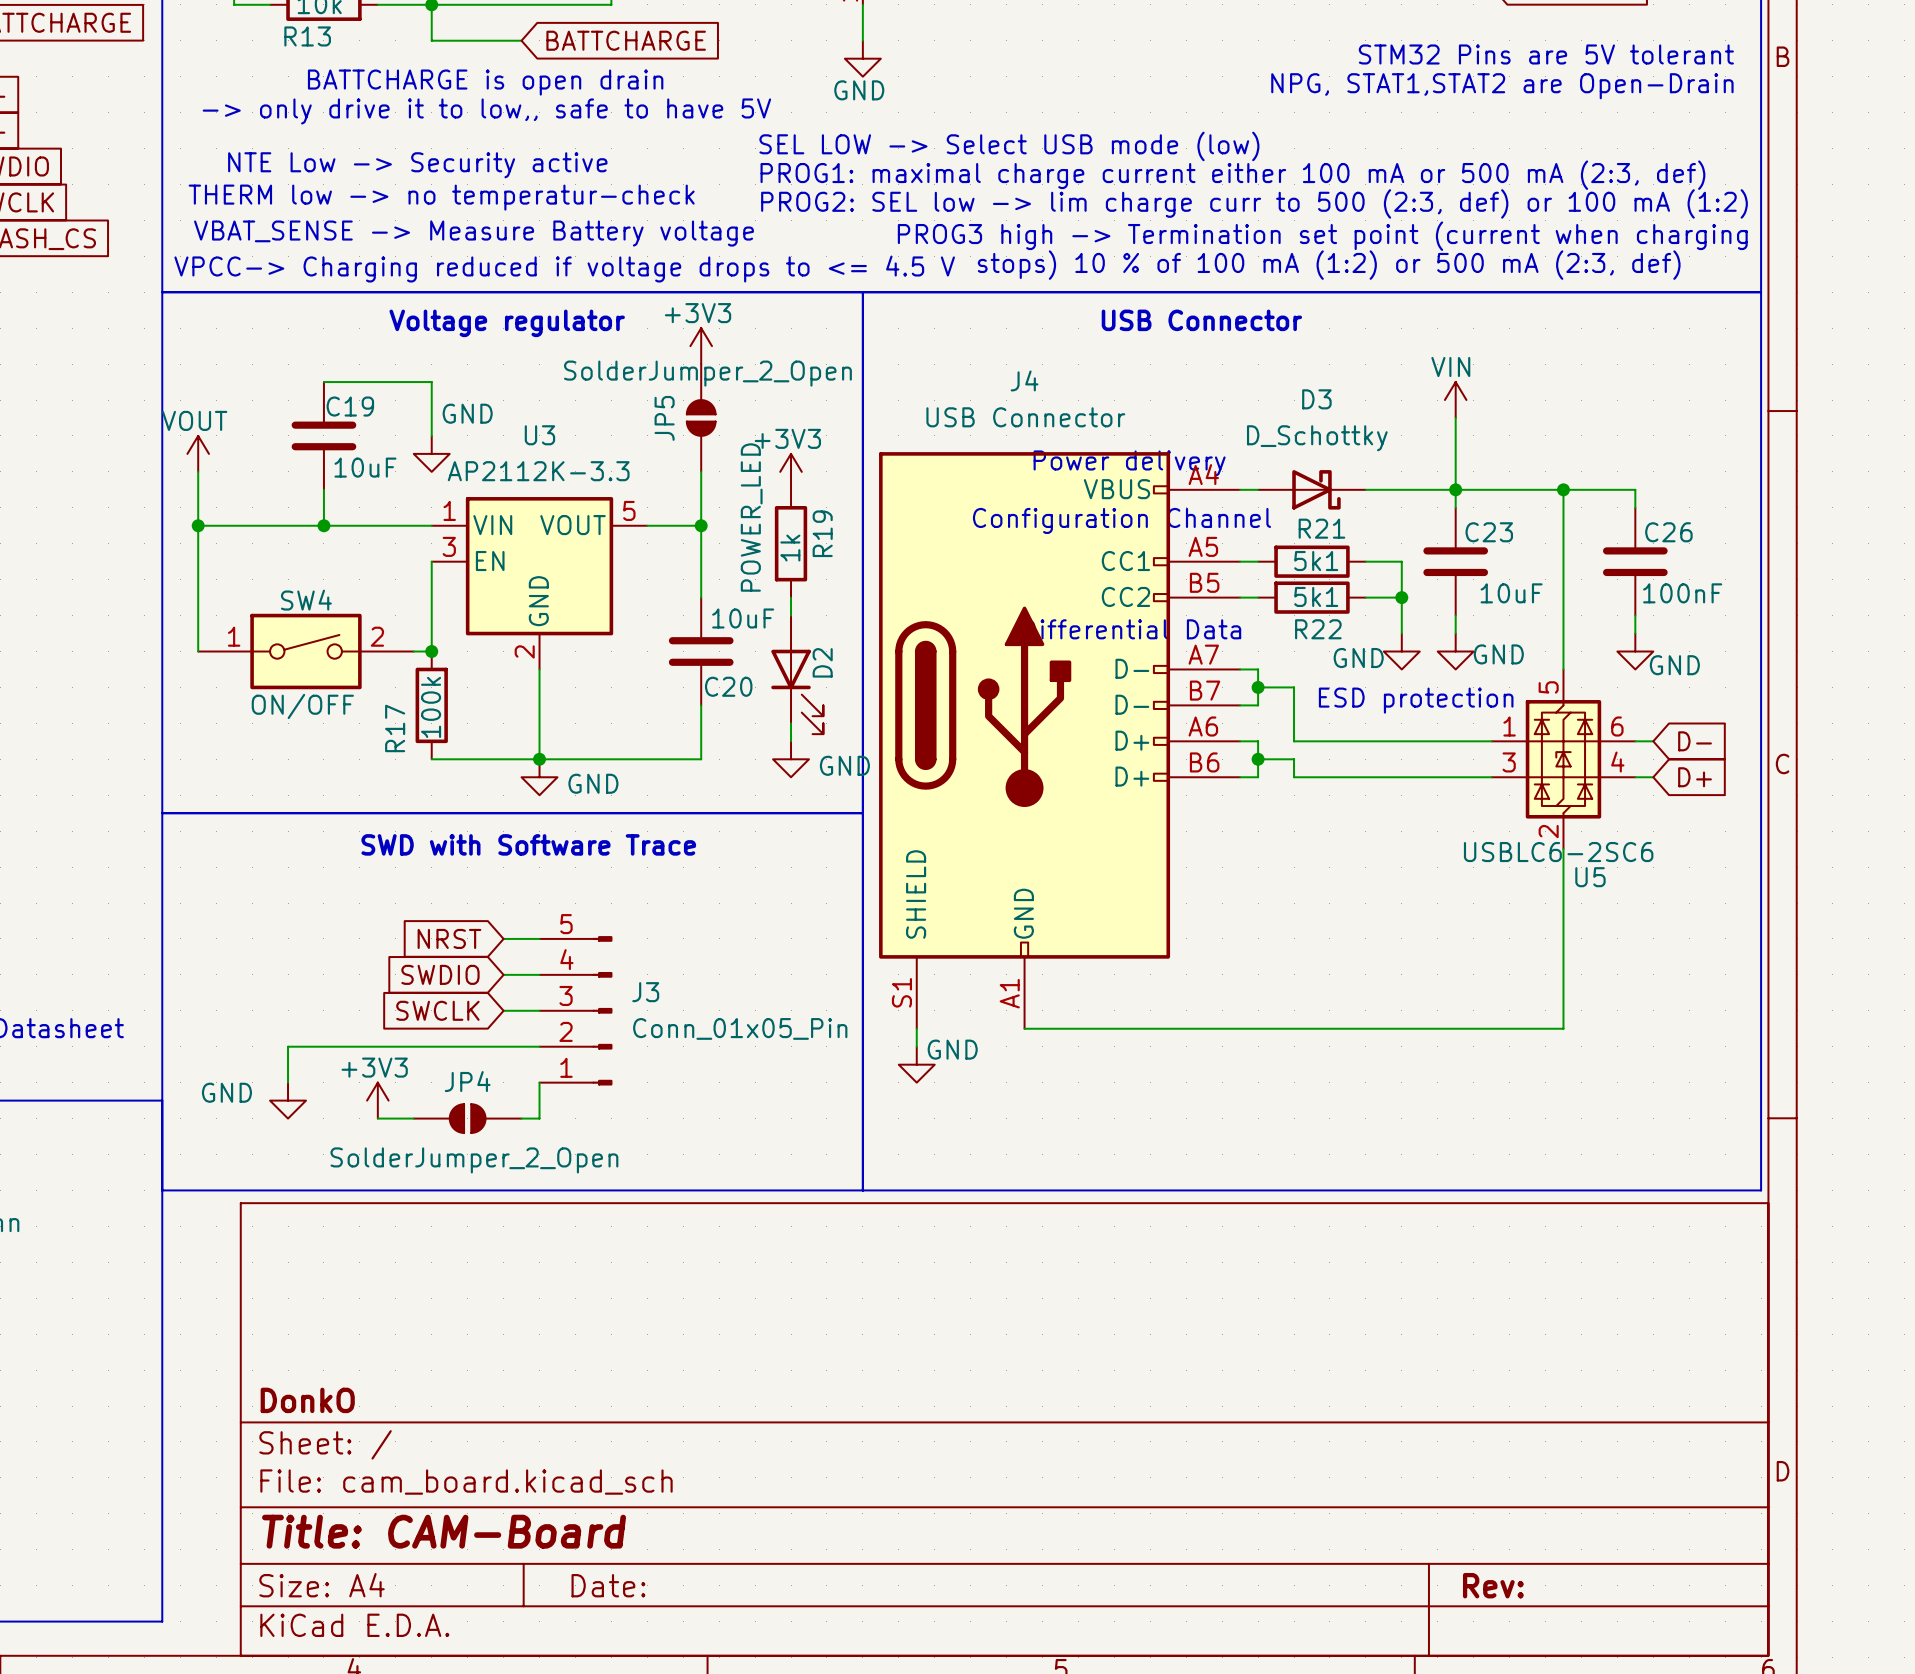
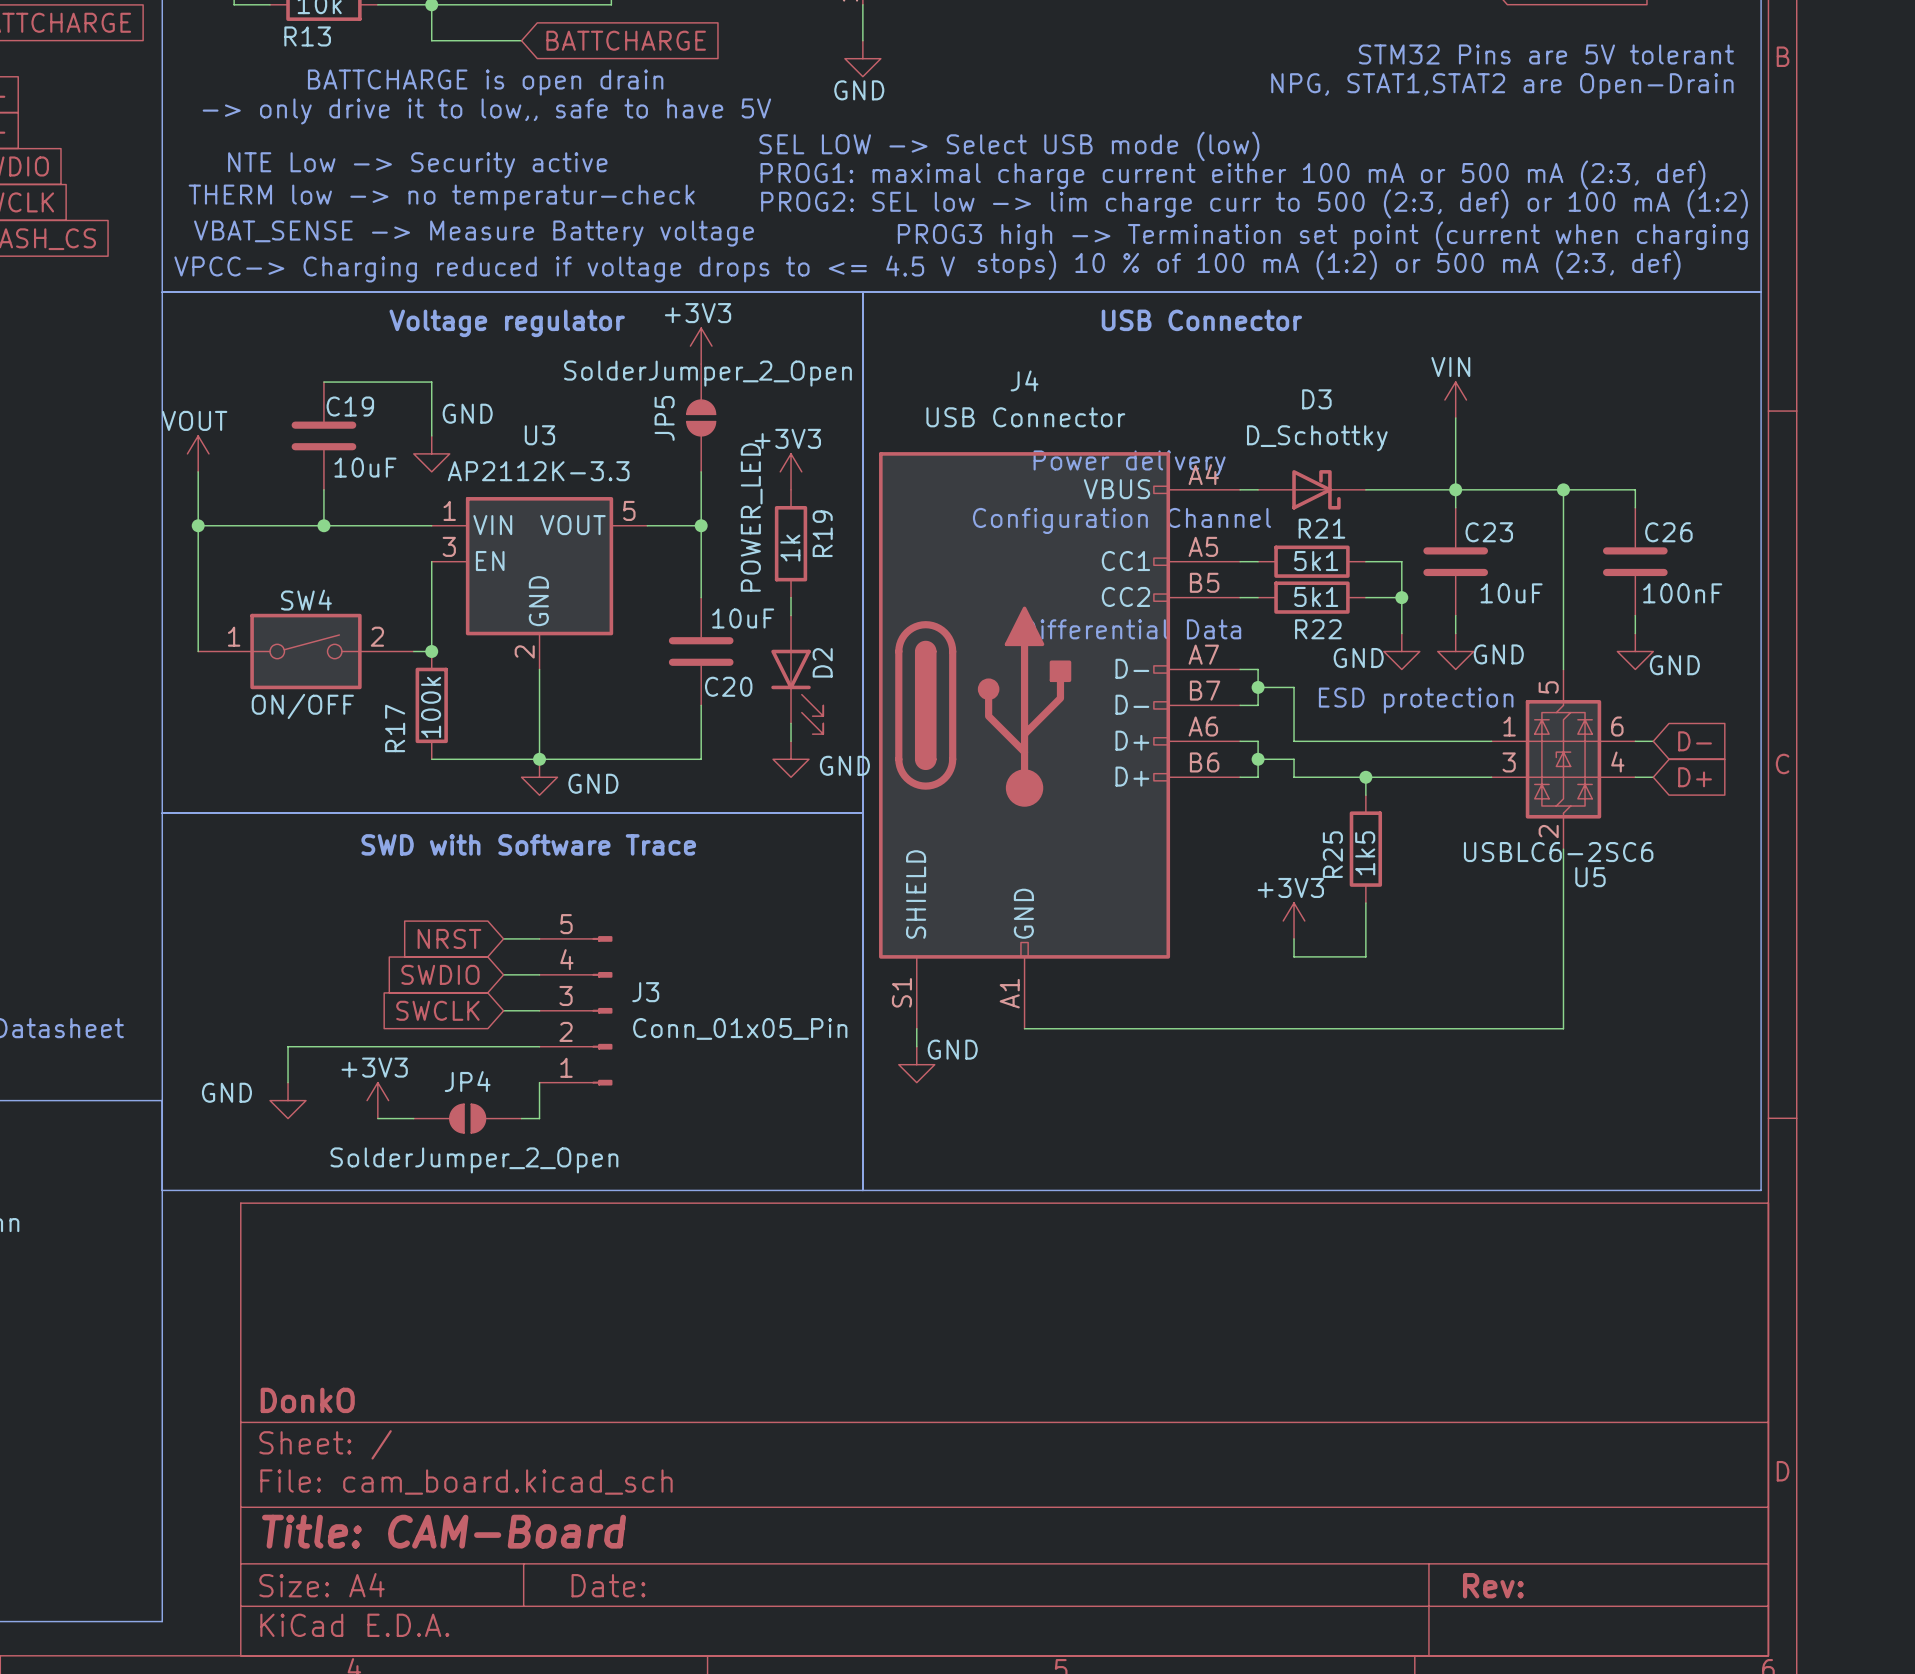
wire: none -> (1365, 777) (1365, 795)
junction: none -> (1365, 777)
R25: none -> 1k5 (1365, 849)
wire: none -> (1365, 903) (1365, 956) (1294, 956) (1294, 938)
power symbol: none -> +3V3 (1294, 920)

